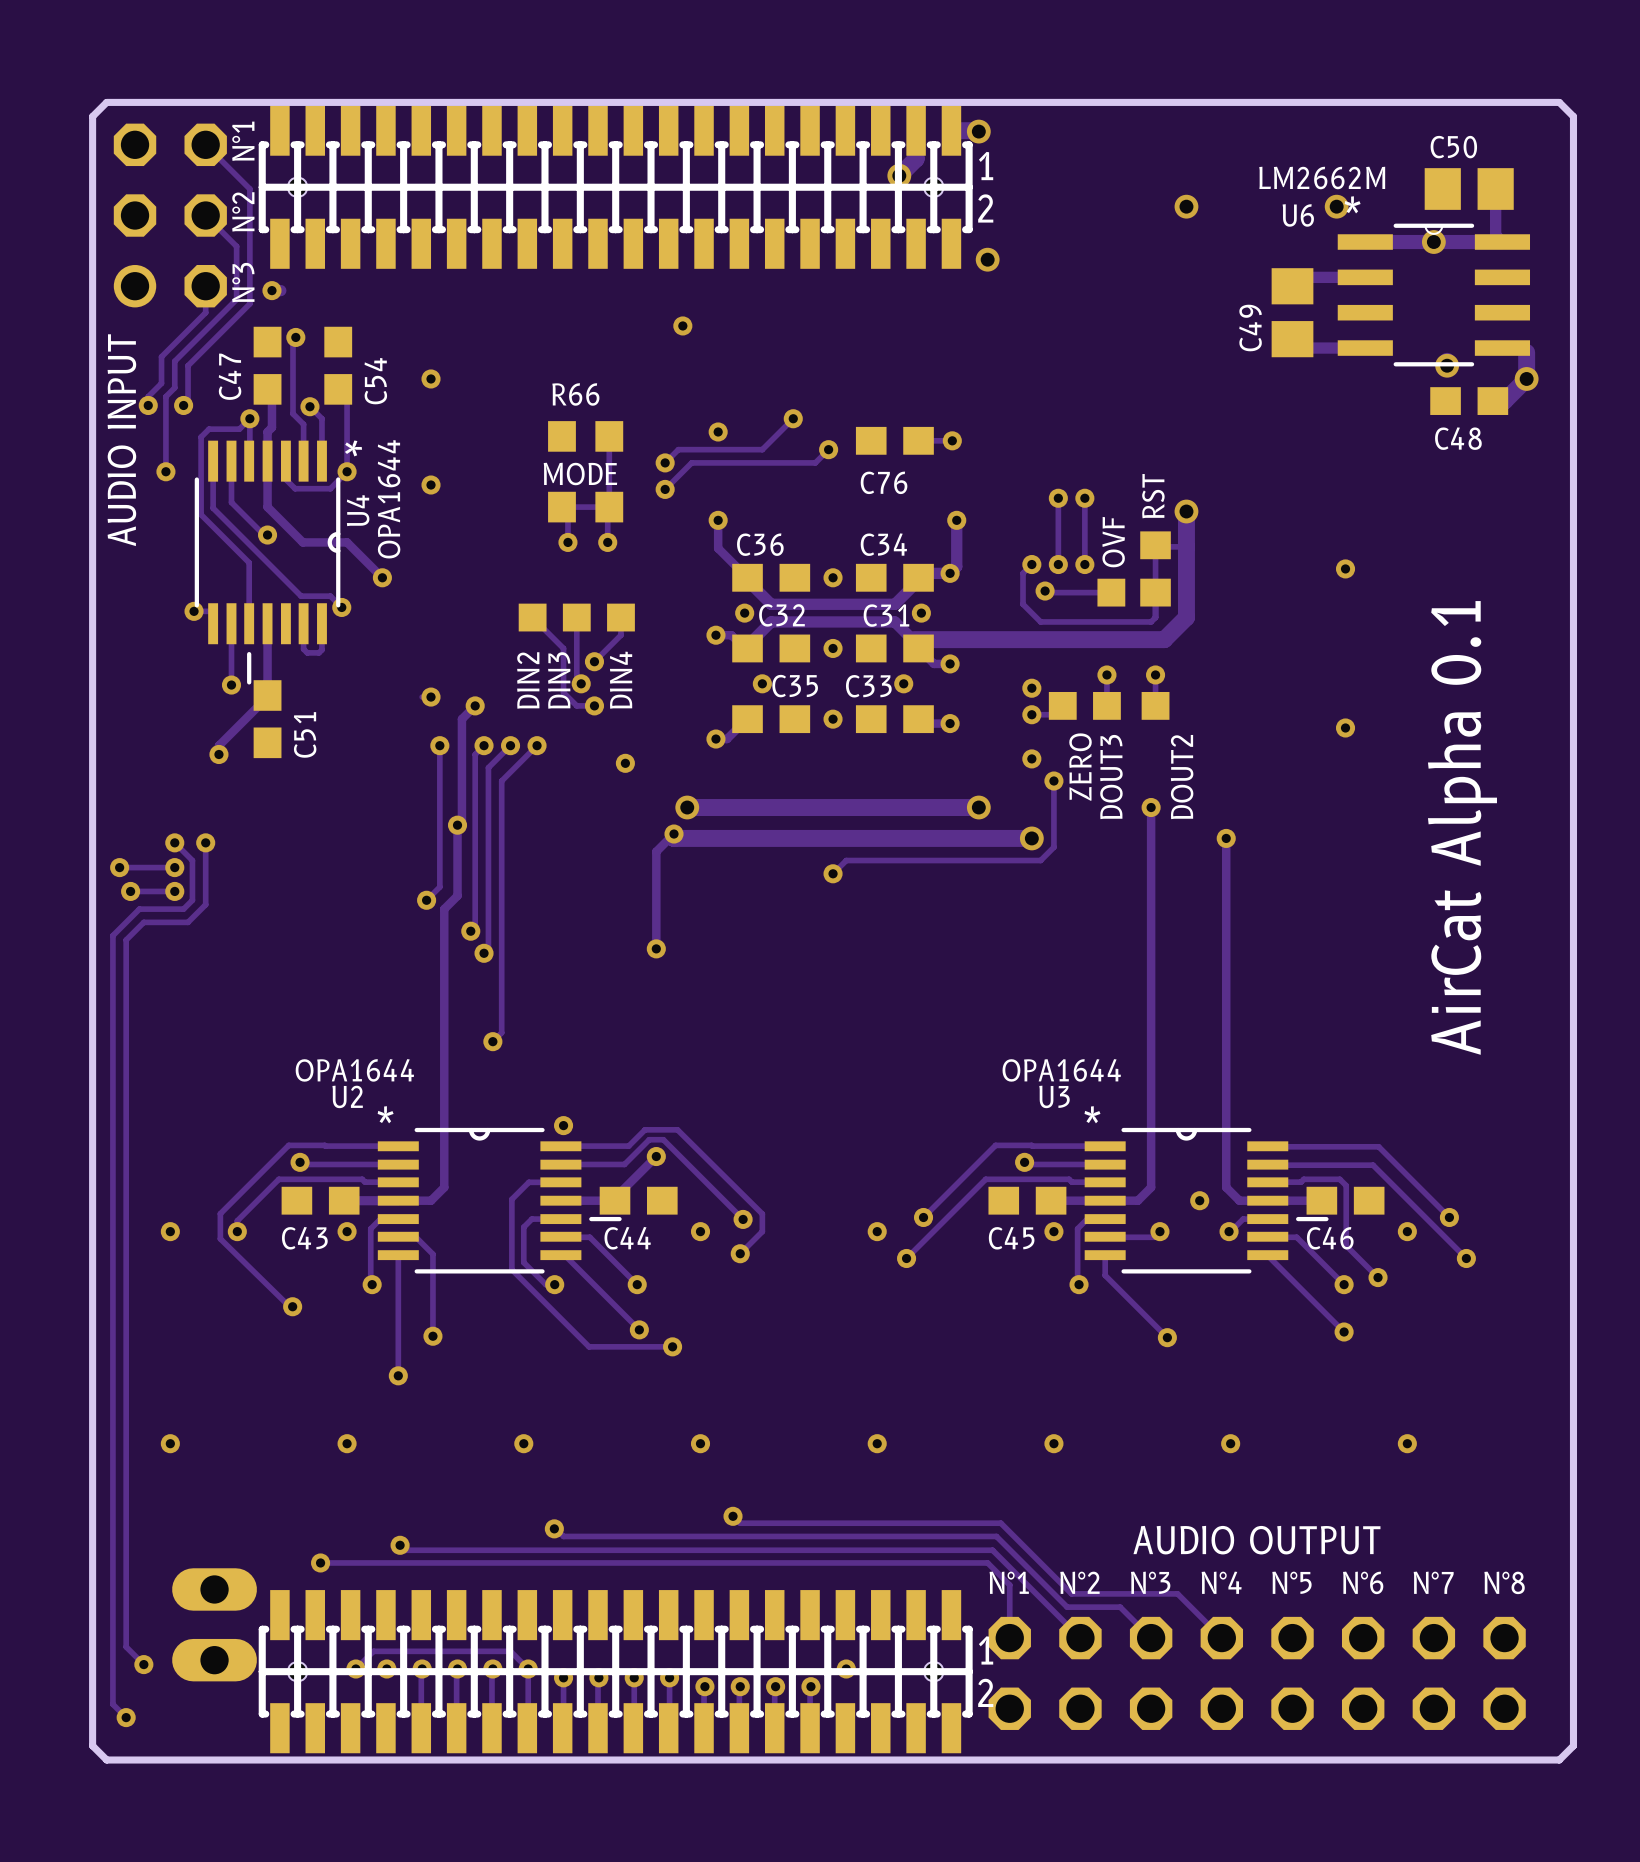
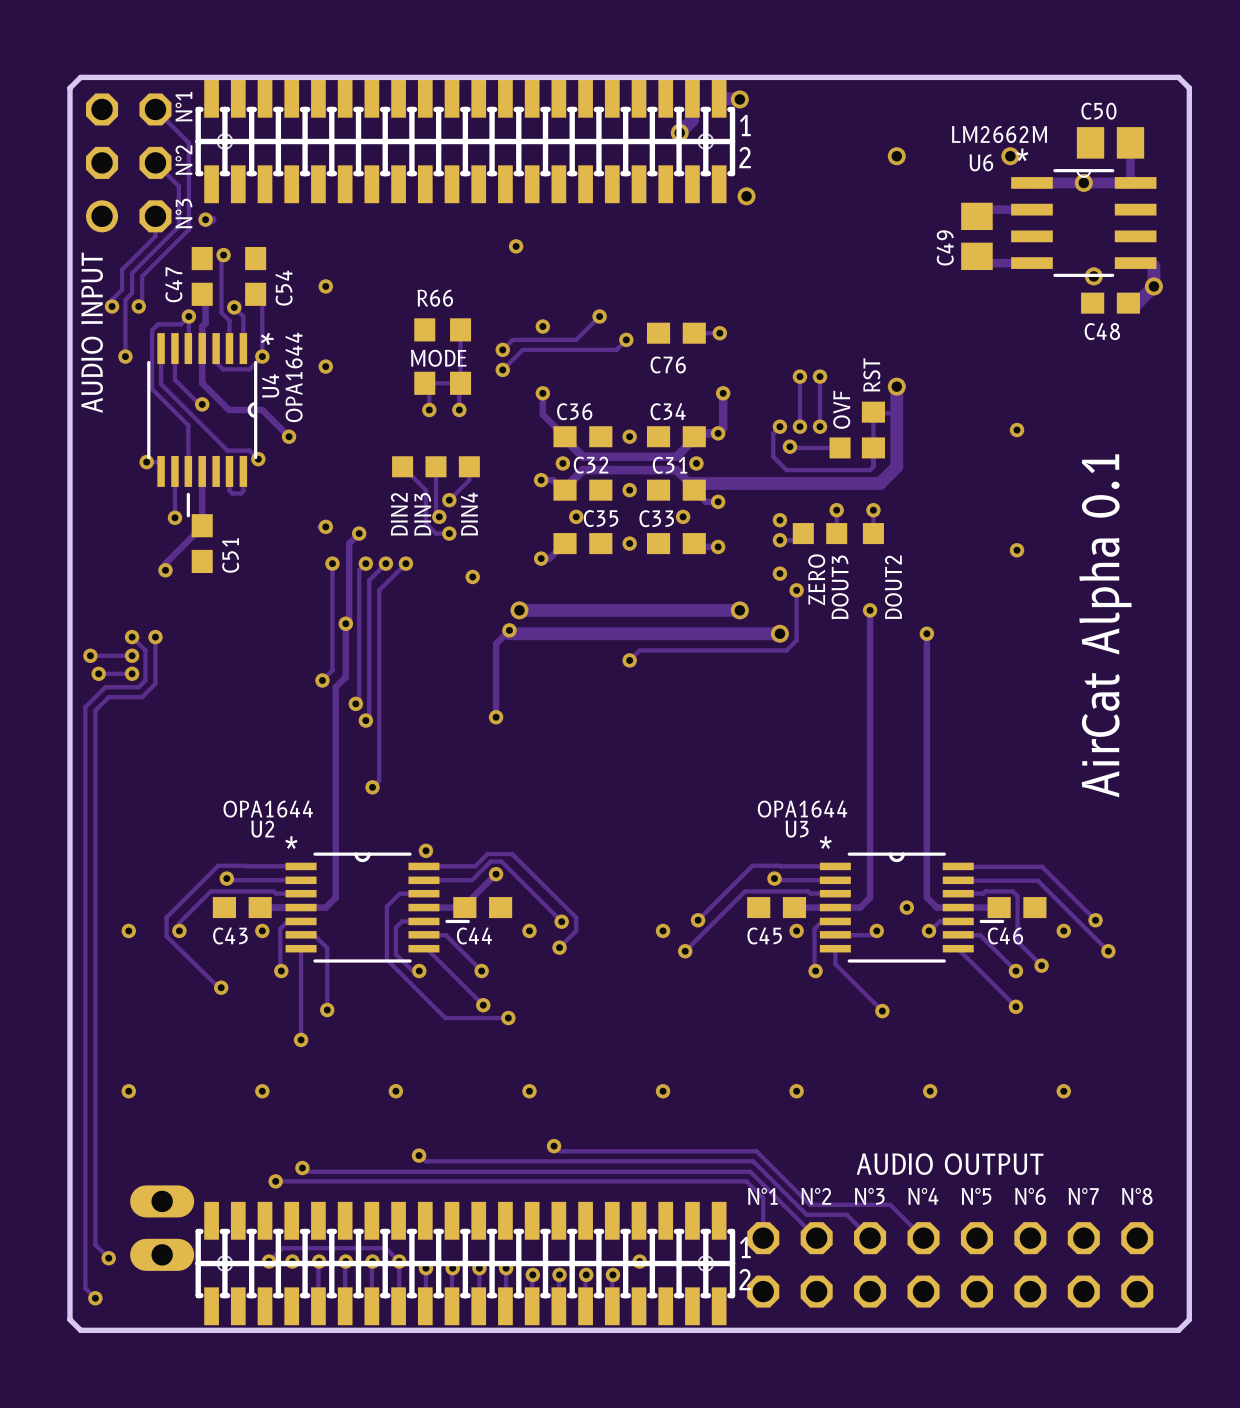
via position: (320, 1562) -> (275, 1181)
track: (364, 1562) (320, 1562) -> none

